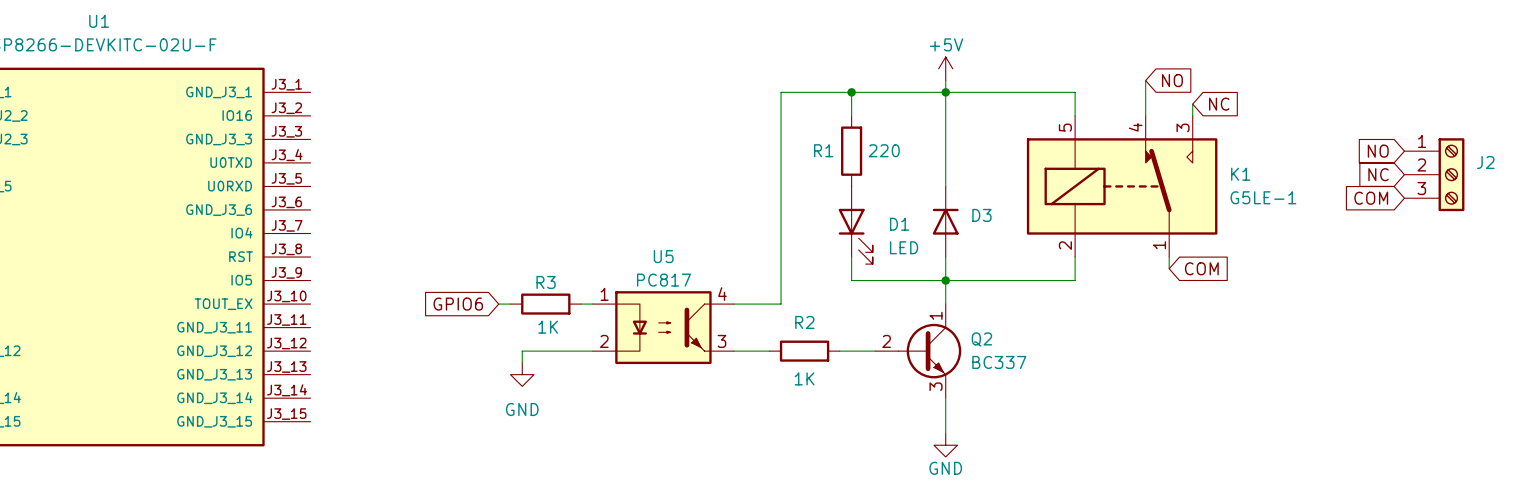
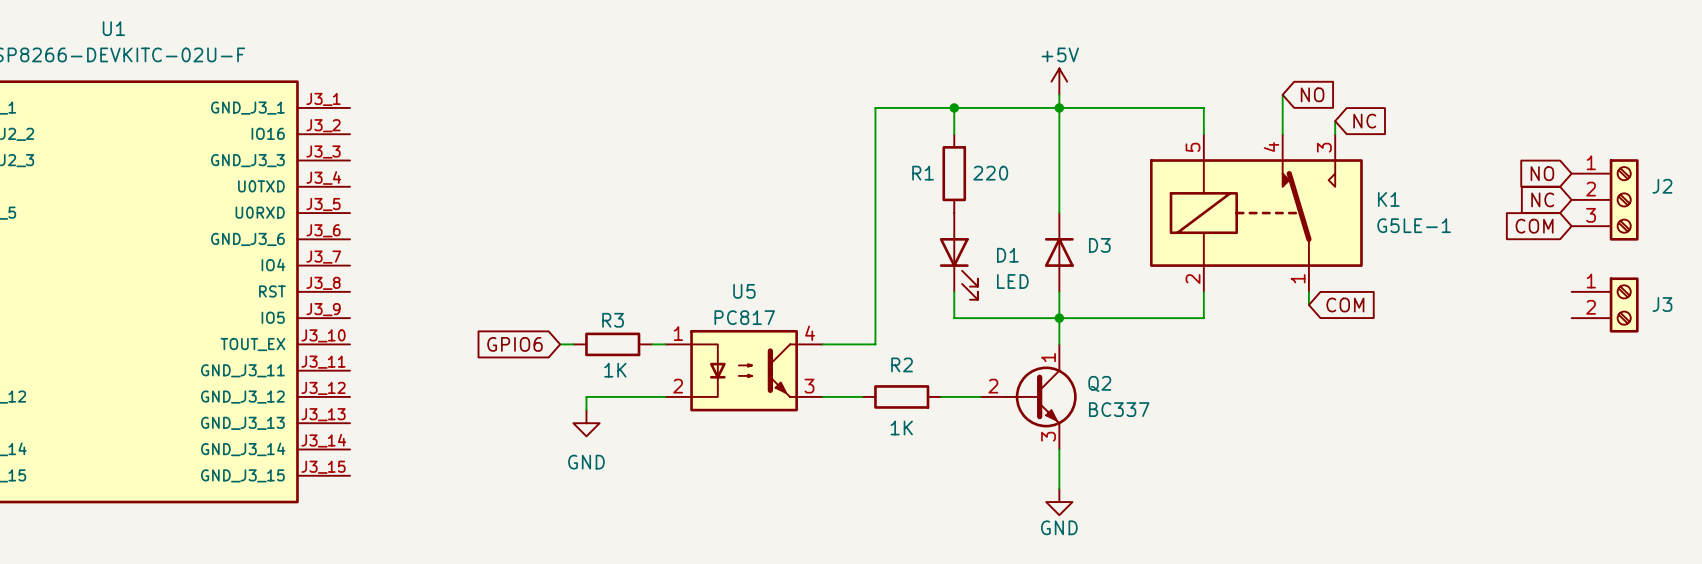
J3: none -> (1605, 305)

